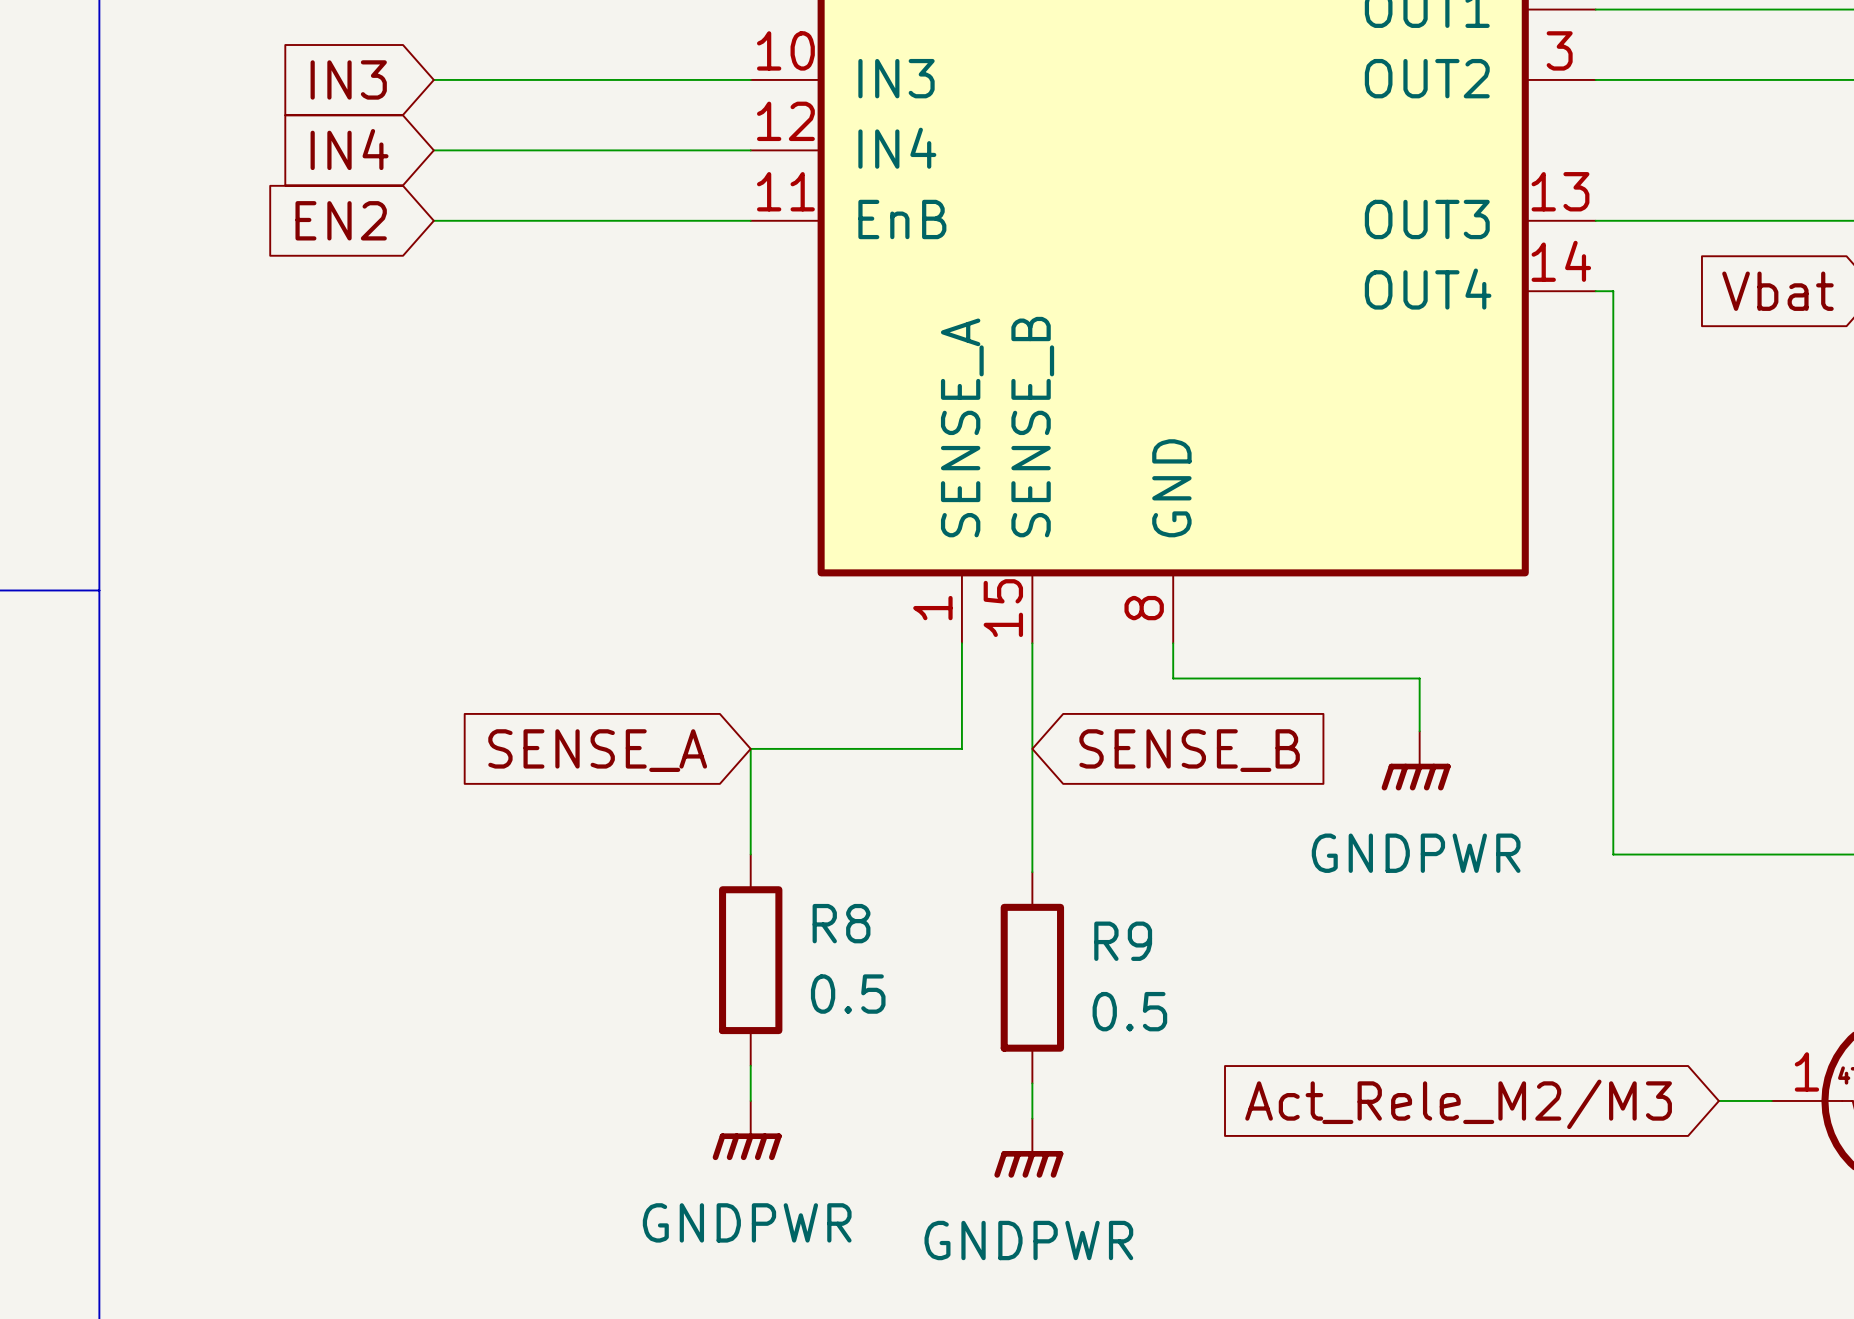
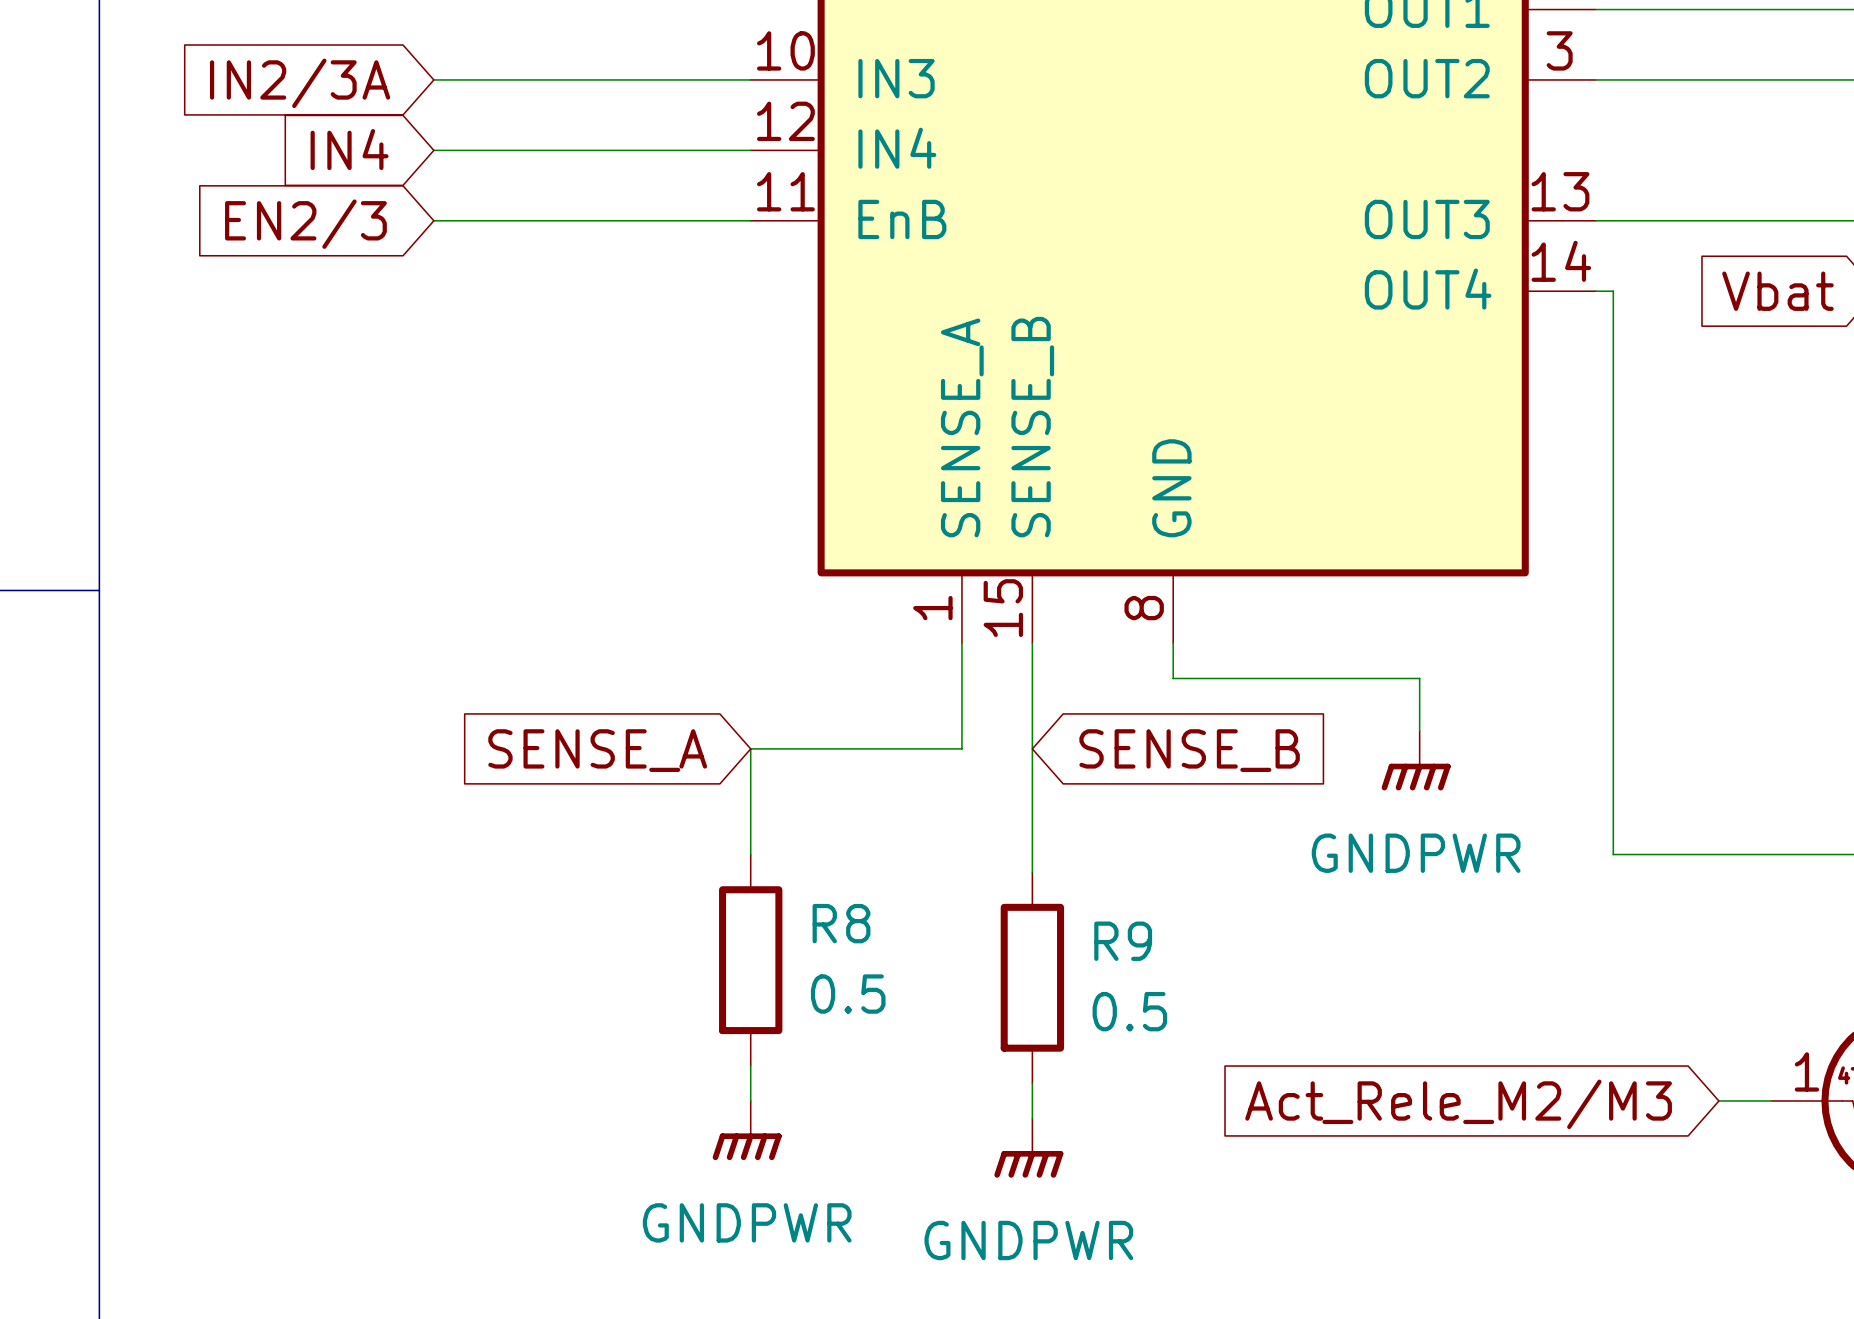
global label: IN3 (348, 79) -> IN2/3A (300, 83)
global label: EN2 (341, 220) -> EN2/3 (305, 224)

